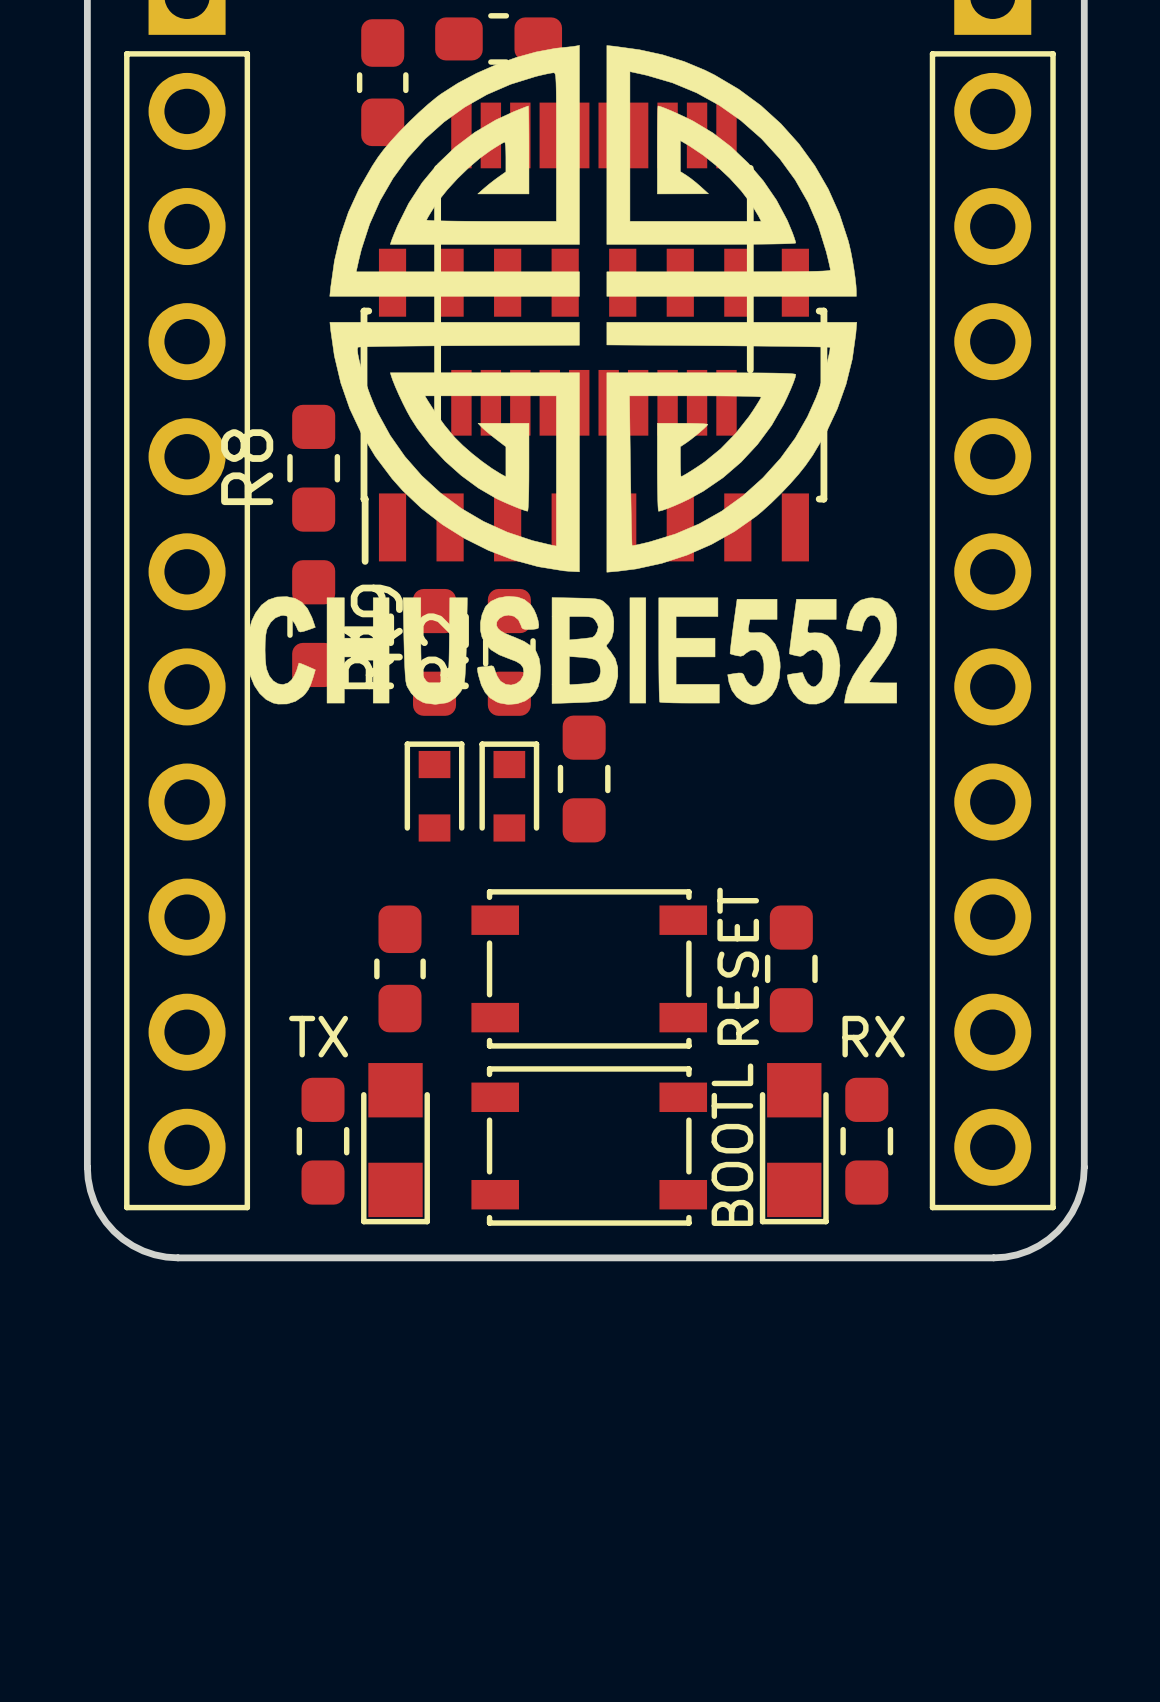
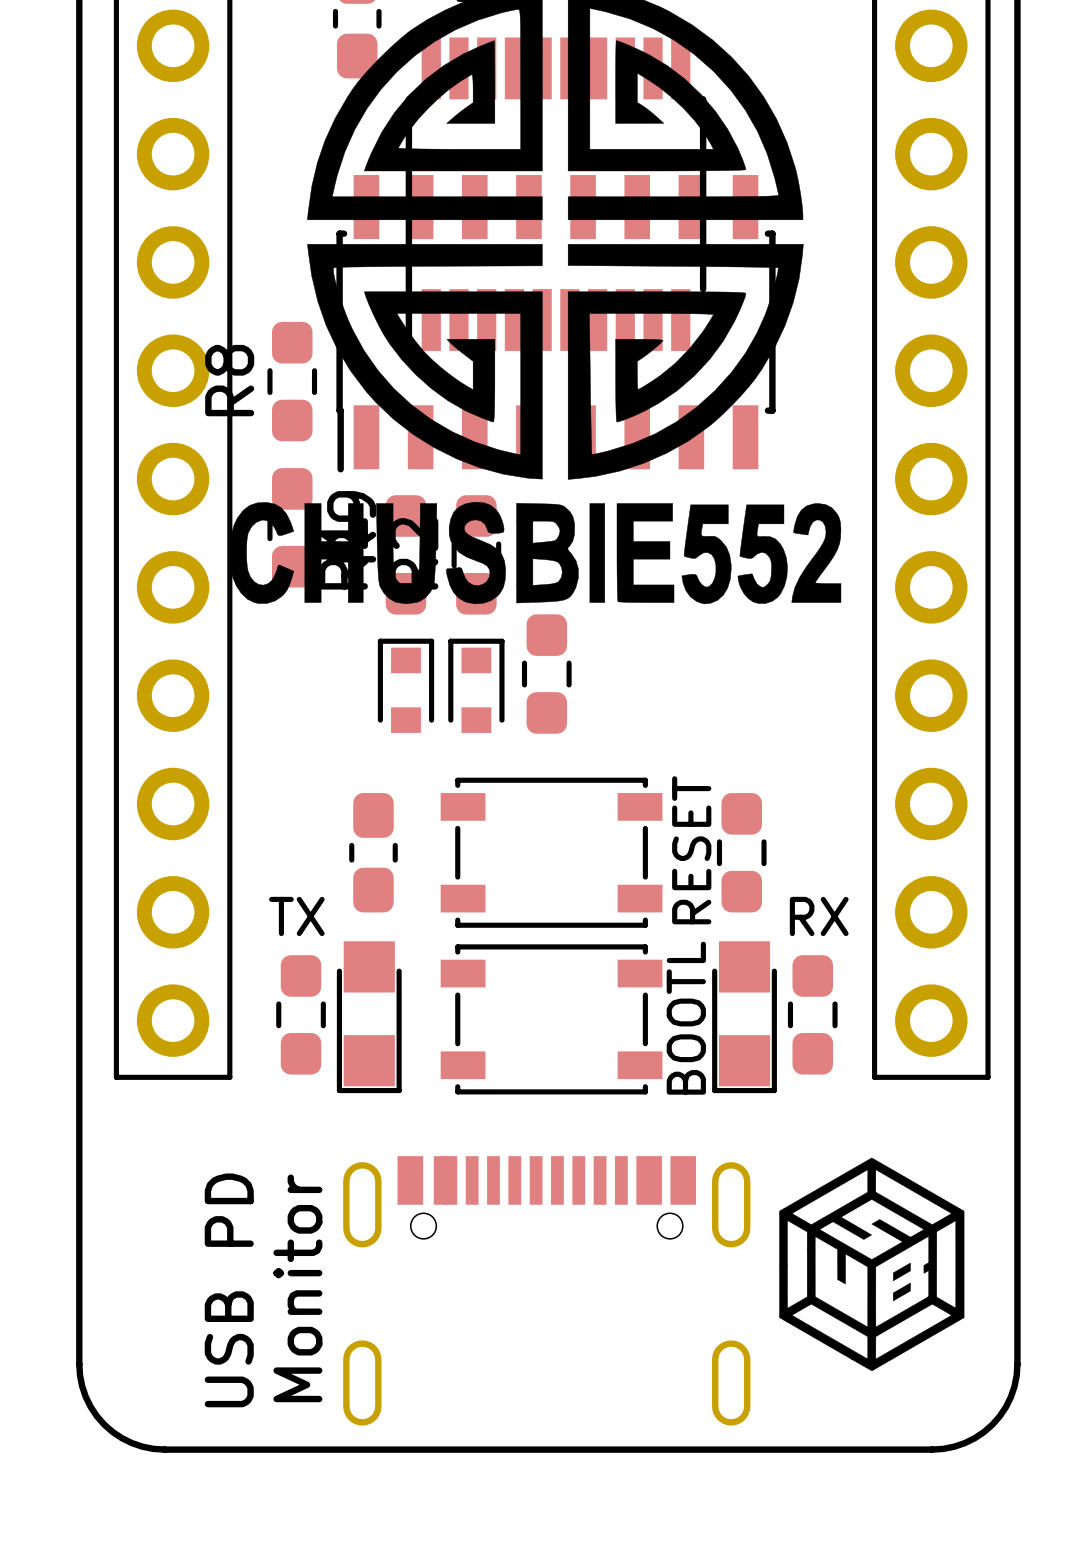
board edge: (87, 1167) (90, 1190) (94, 1201) (99, 1212) (113, 1231) (132, 1245) (143, 1250) (154, 1254) (178, 1257) (1005, 1257) (1028, 1250) (1038, 1245) (1048, 1239) (1065, 1222) (1077, 1201) (1081, 1190) (1084, 1167) -> (79, 1039) (79, 1364) (82, 1386) (90, 1406) (112, 1431) (131, 1443) (164, 1449) (932, 1449) (964, 1443) (984, 1431) (999, 1416) (1010, 1396) (1016, 1375) (1017, 1039)
drawing: none -> [779, 1157, 965, 1372]
text: none -> Monitor (297, 1288)
text: none -> USB PD (229, 1290)
part: none -> (546, 1290)

